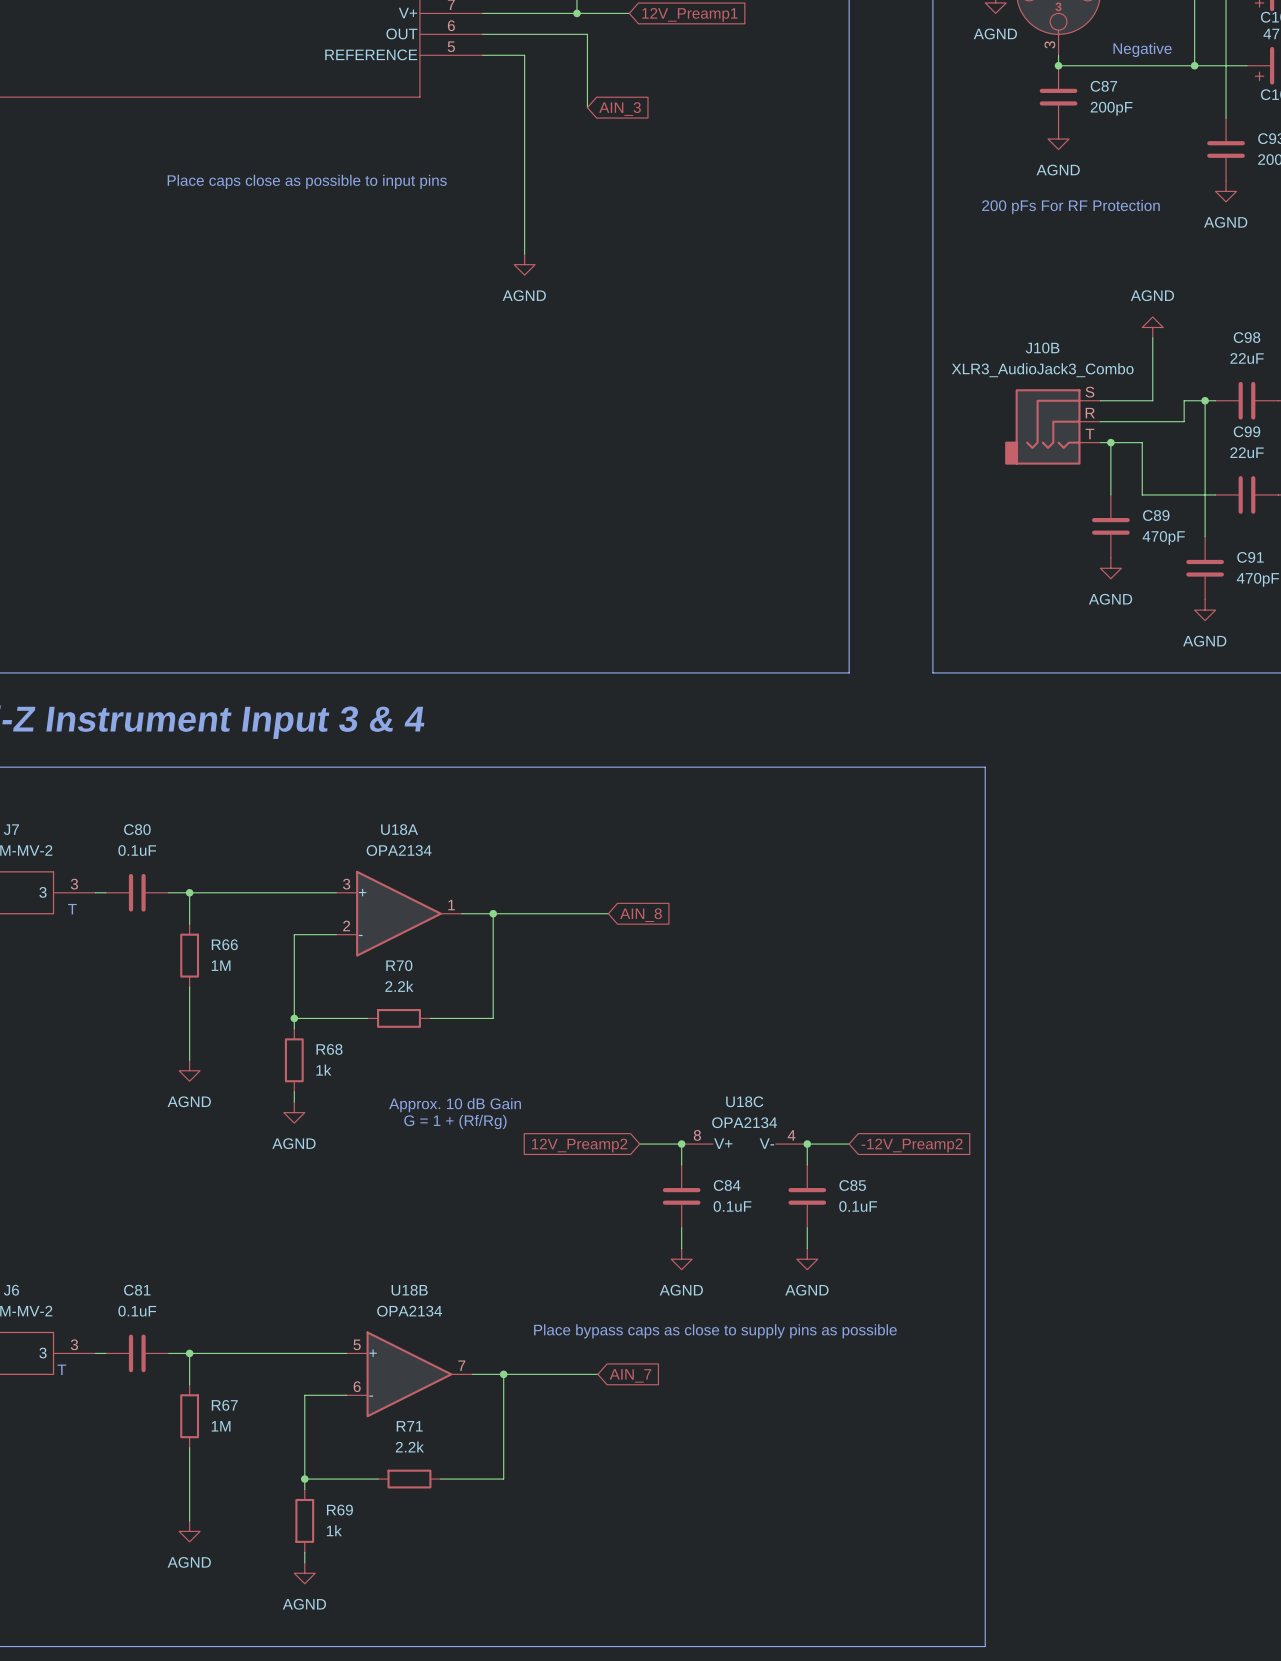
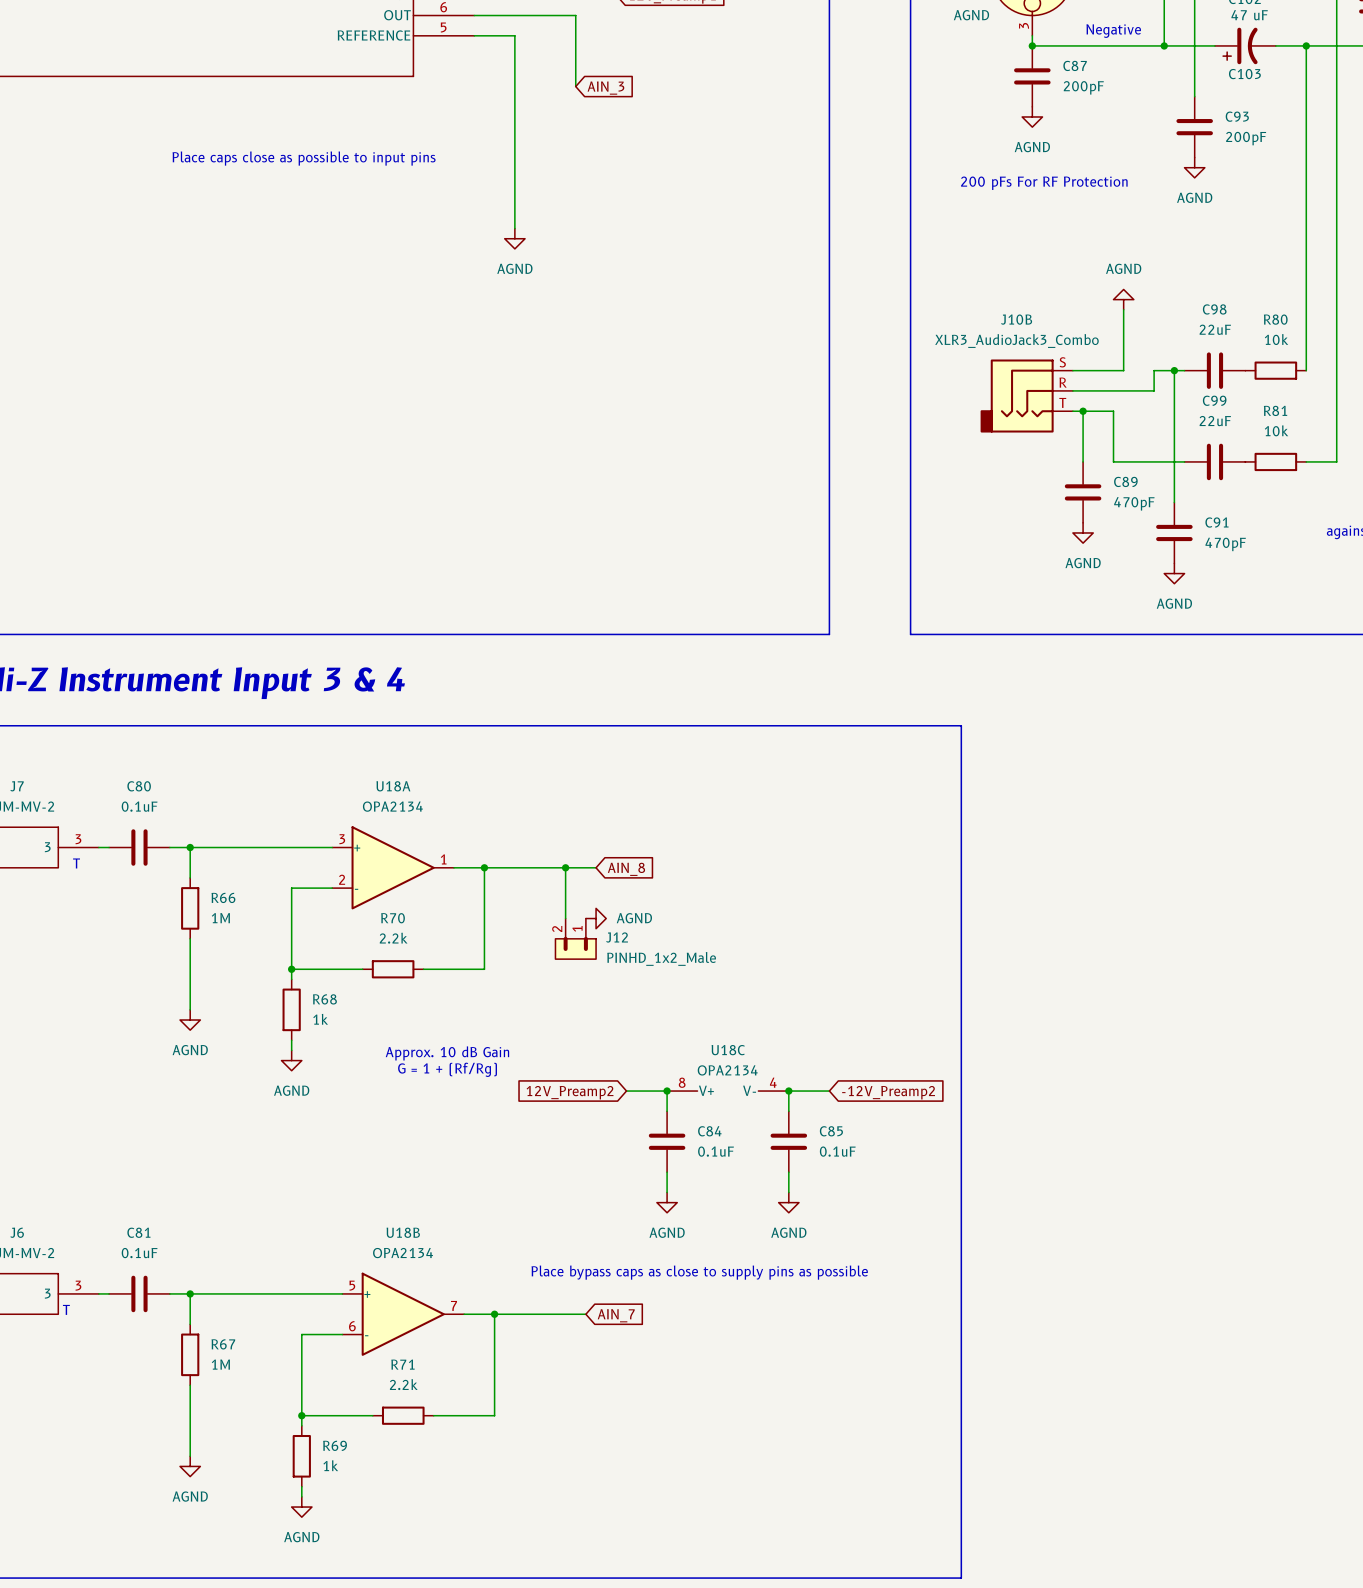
wire: none -> (565, 867) (565, 918)
junction: none -> (565, 867)
power symbol: none -> AGND (596, 918)
J12: none -> PINHD_1x2_Male (575, 938)

